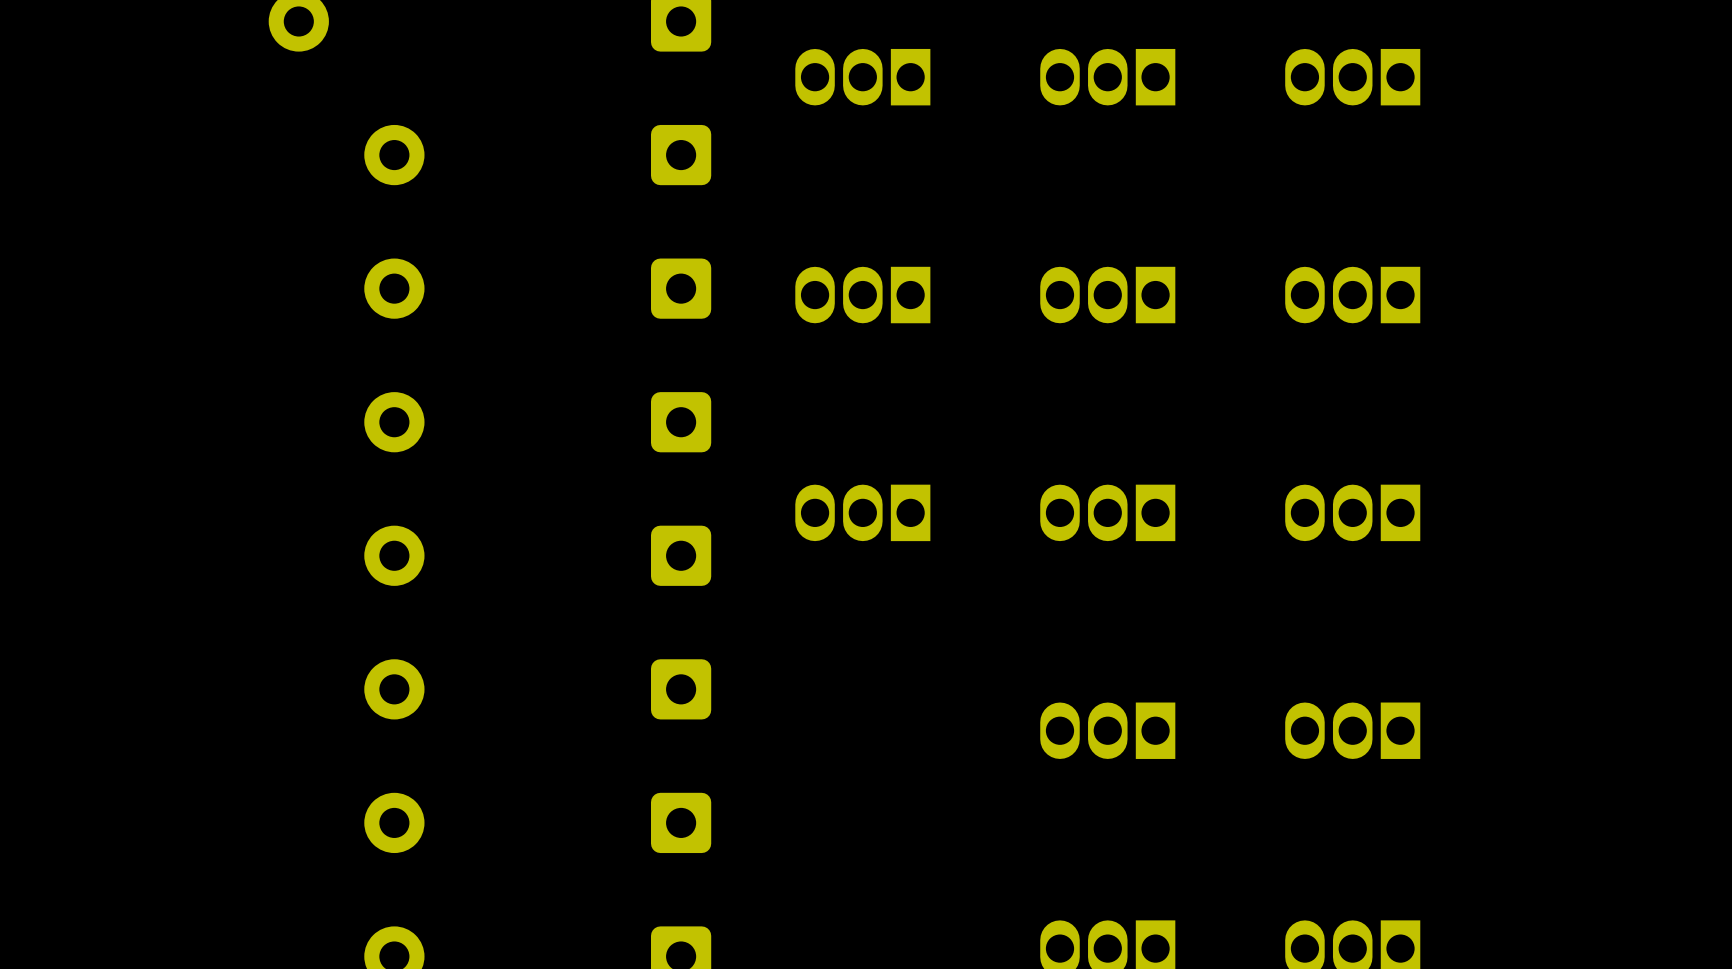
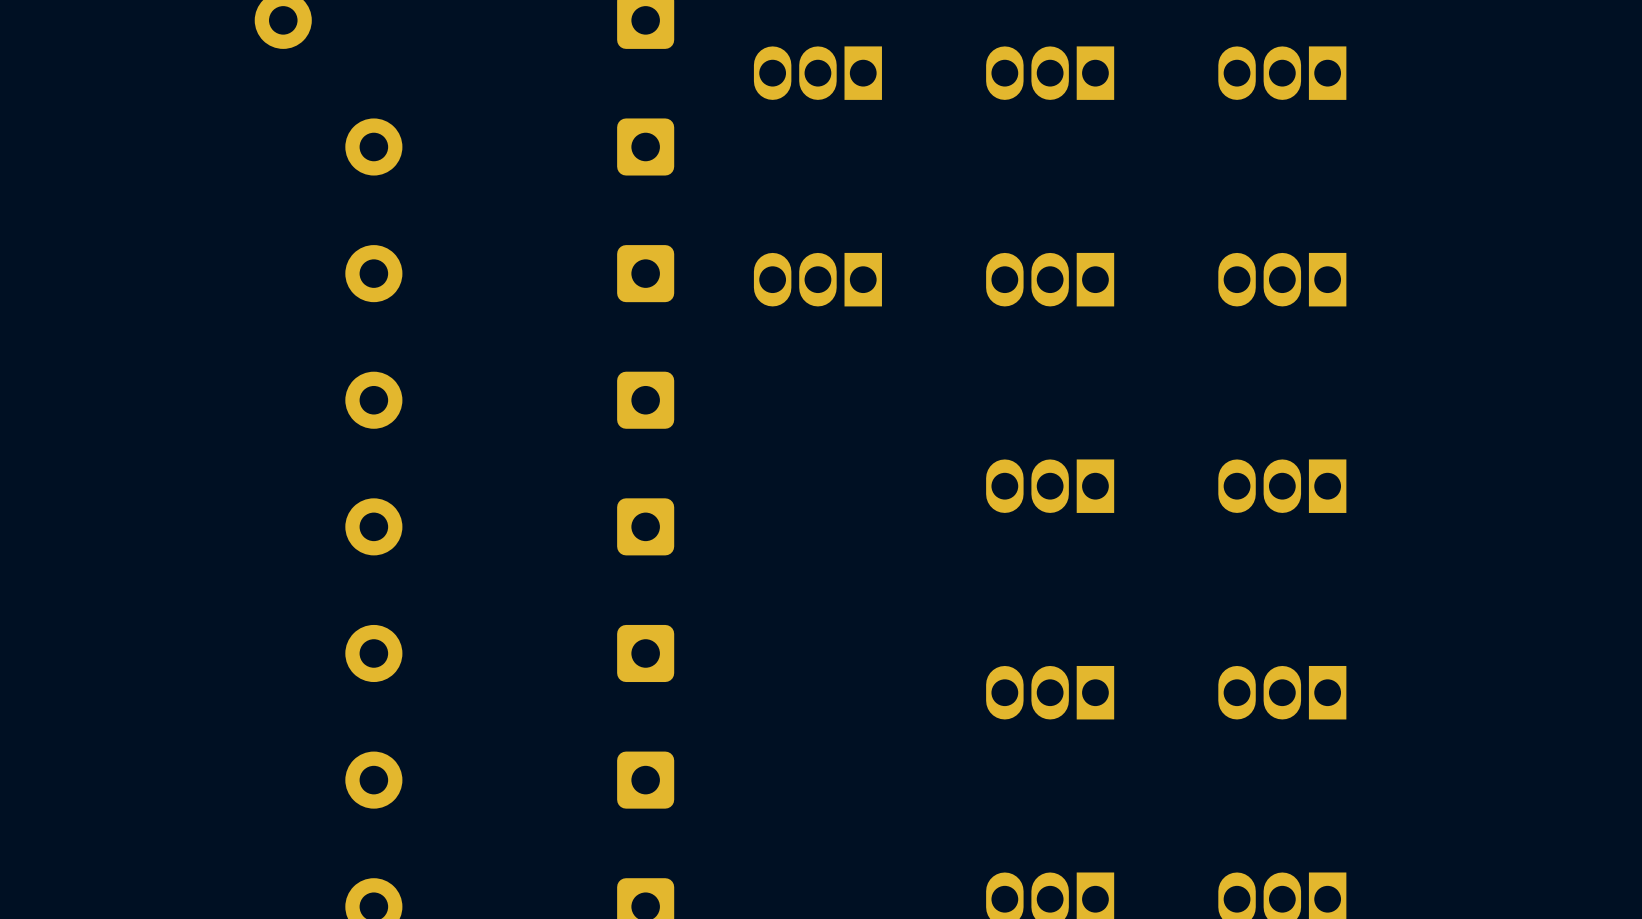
part: (862, 512) -> none

